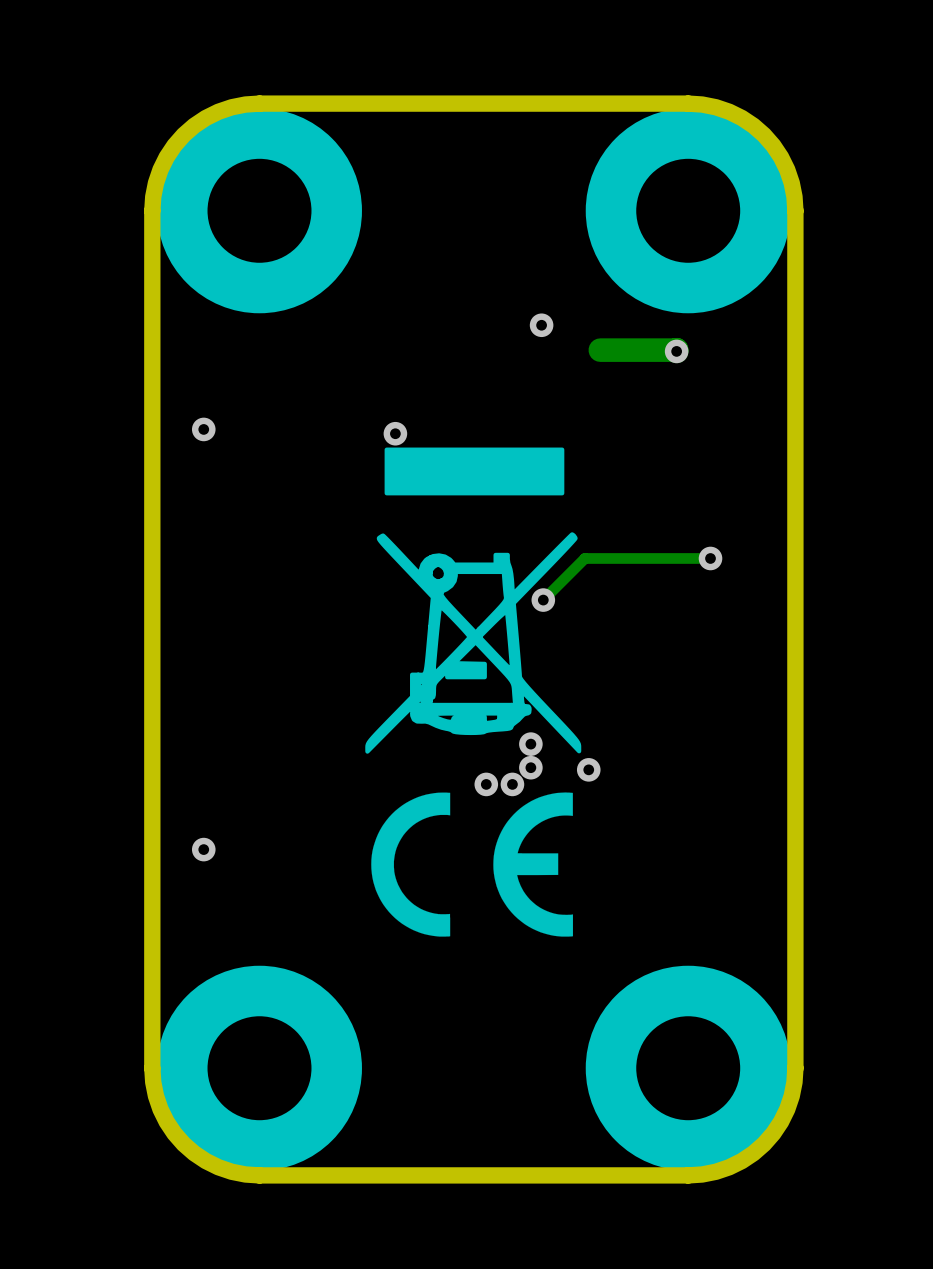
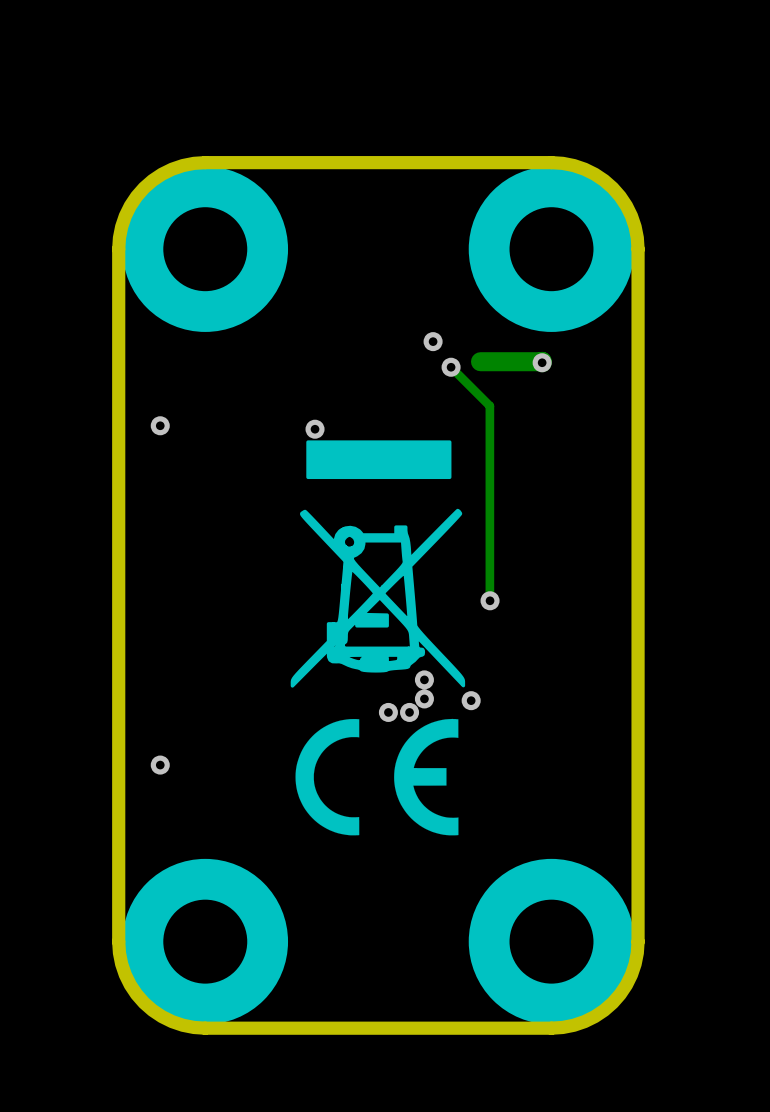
track: none -> (451, 367) (489, 406) (489, 600)
via: none -> (451, 367)
track: (710, 558) (584, 558) (543, 600) -> none
via: (710, 558) -> none
via: (543, 600) -> none
via: none -> (490, 600)

